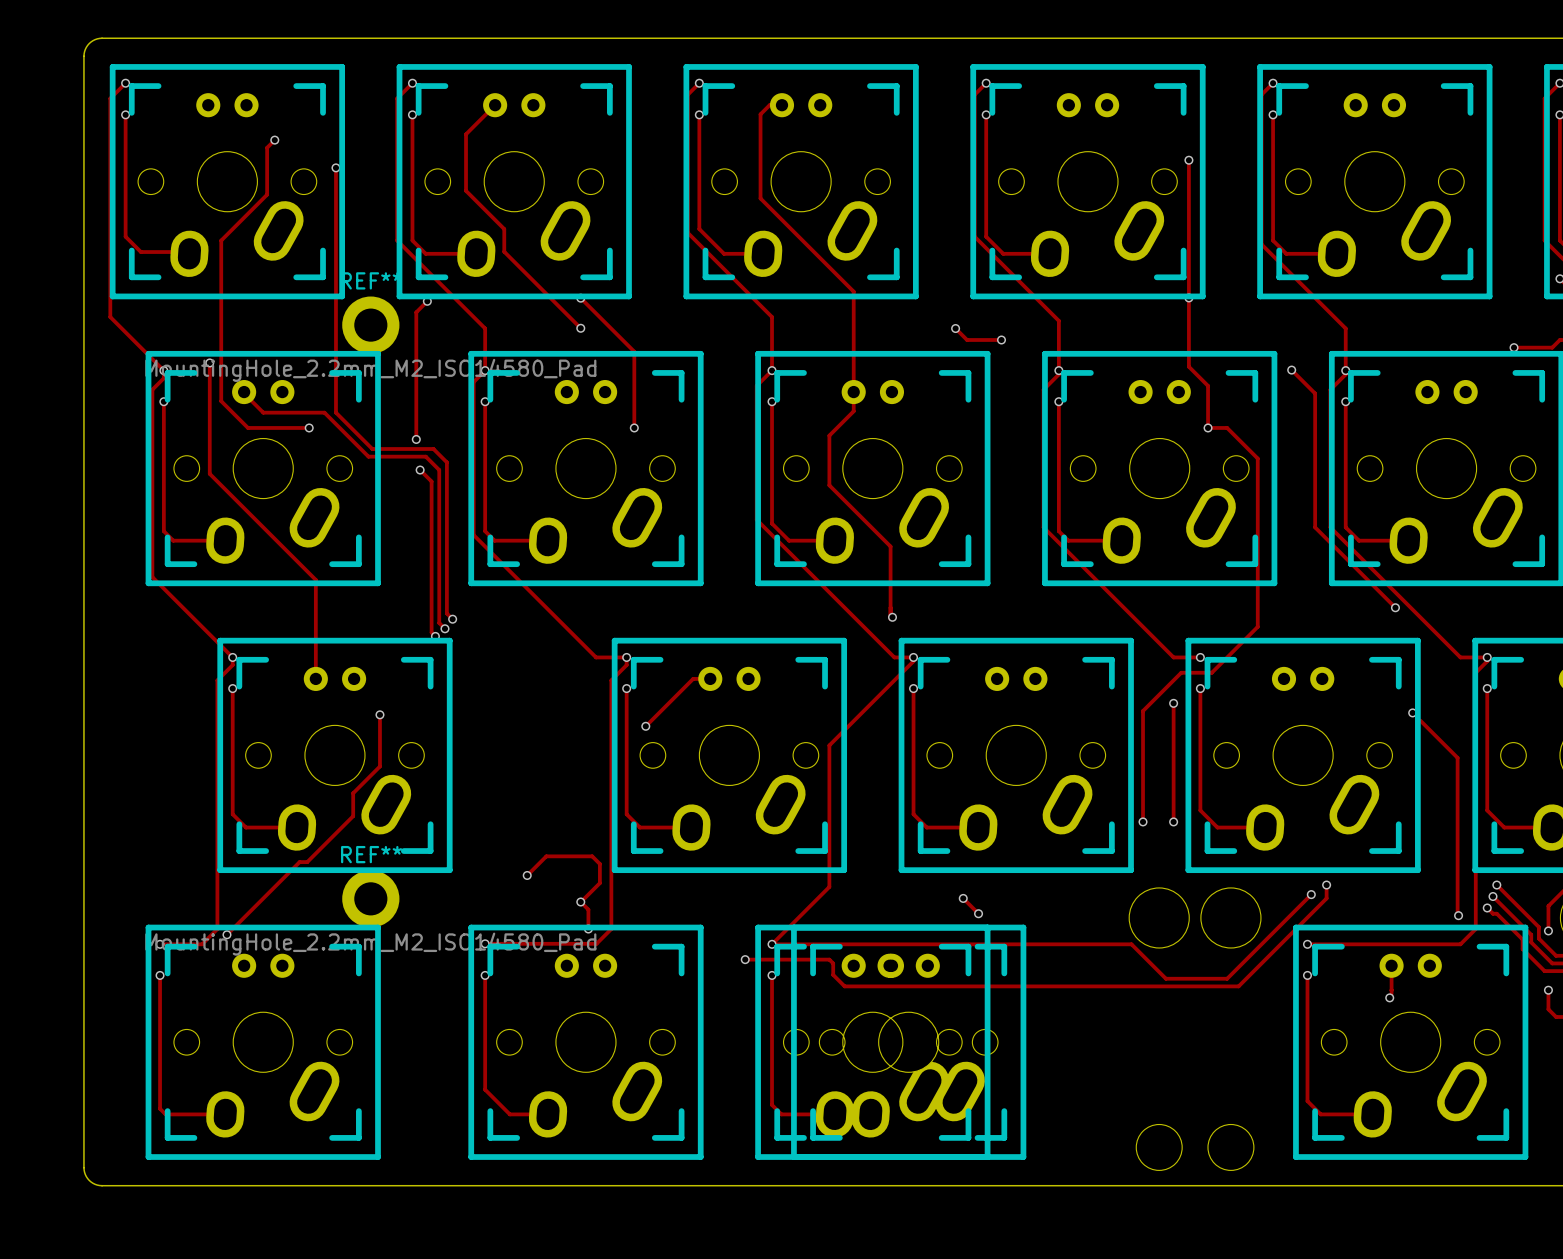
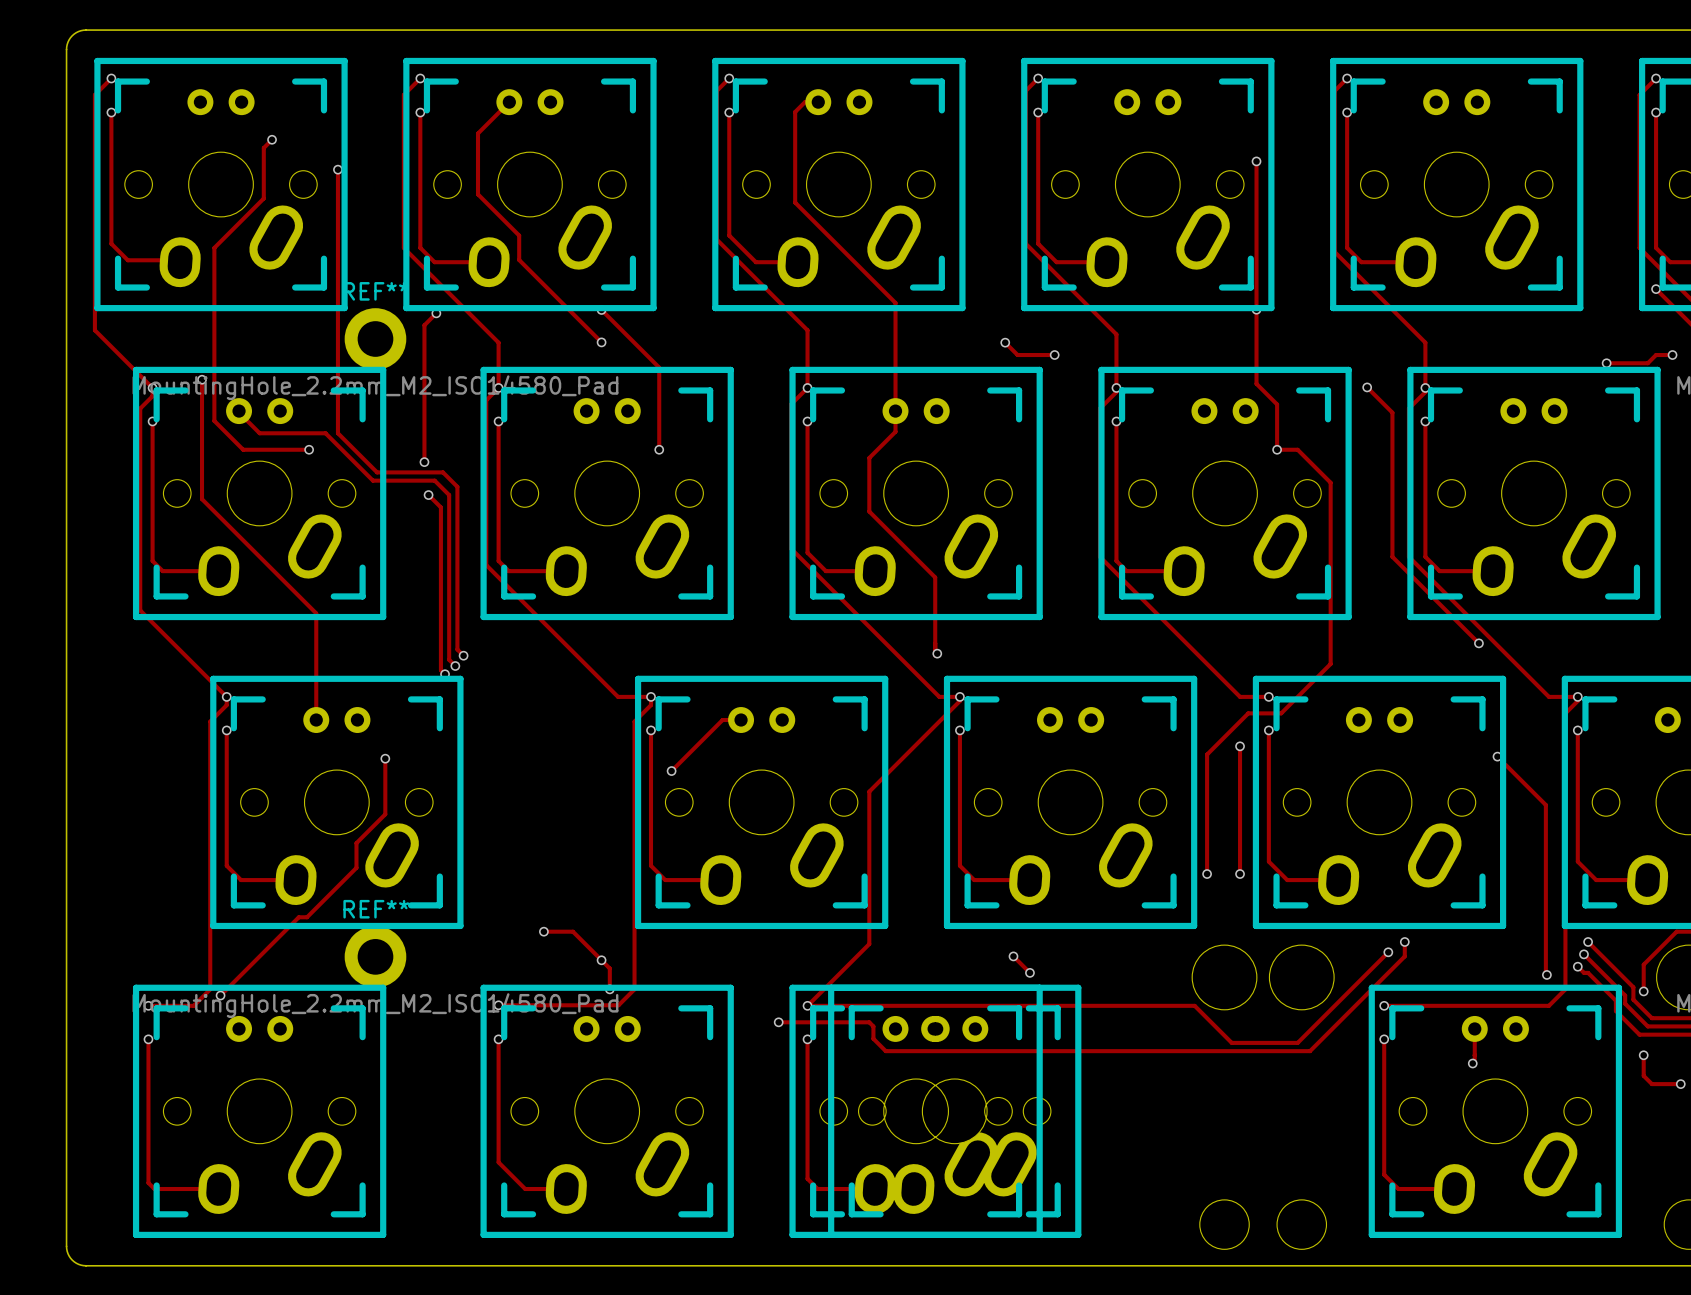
track: (527, 875) (546, 856) (592, 856) (599, 864) (599, 883) (581, 902) -> (543, 931) (573, 931) (601, 960)

